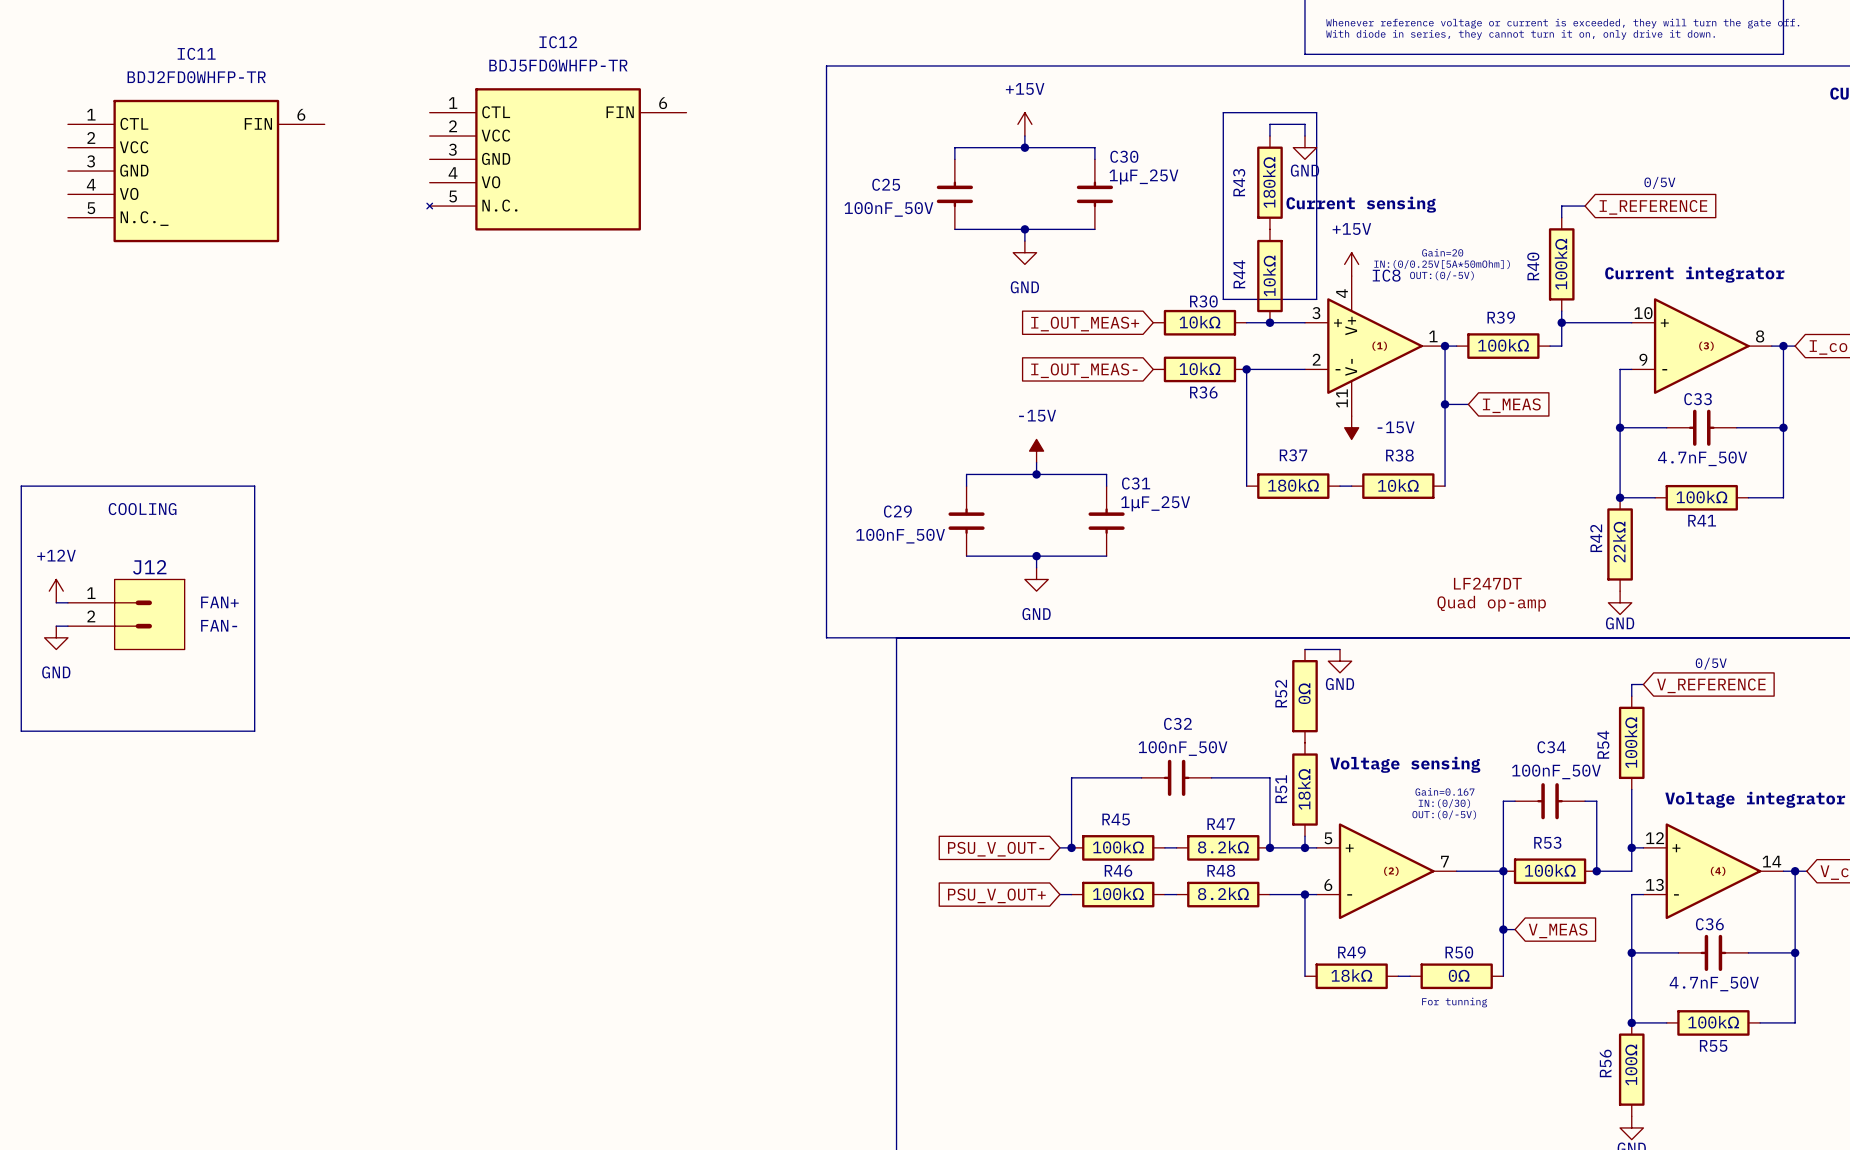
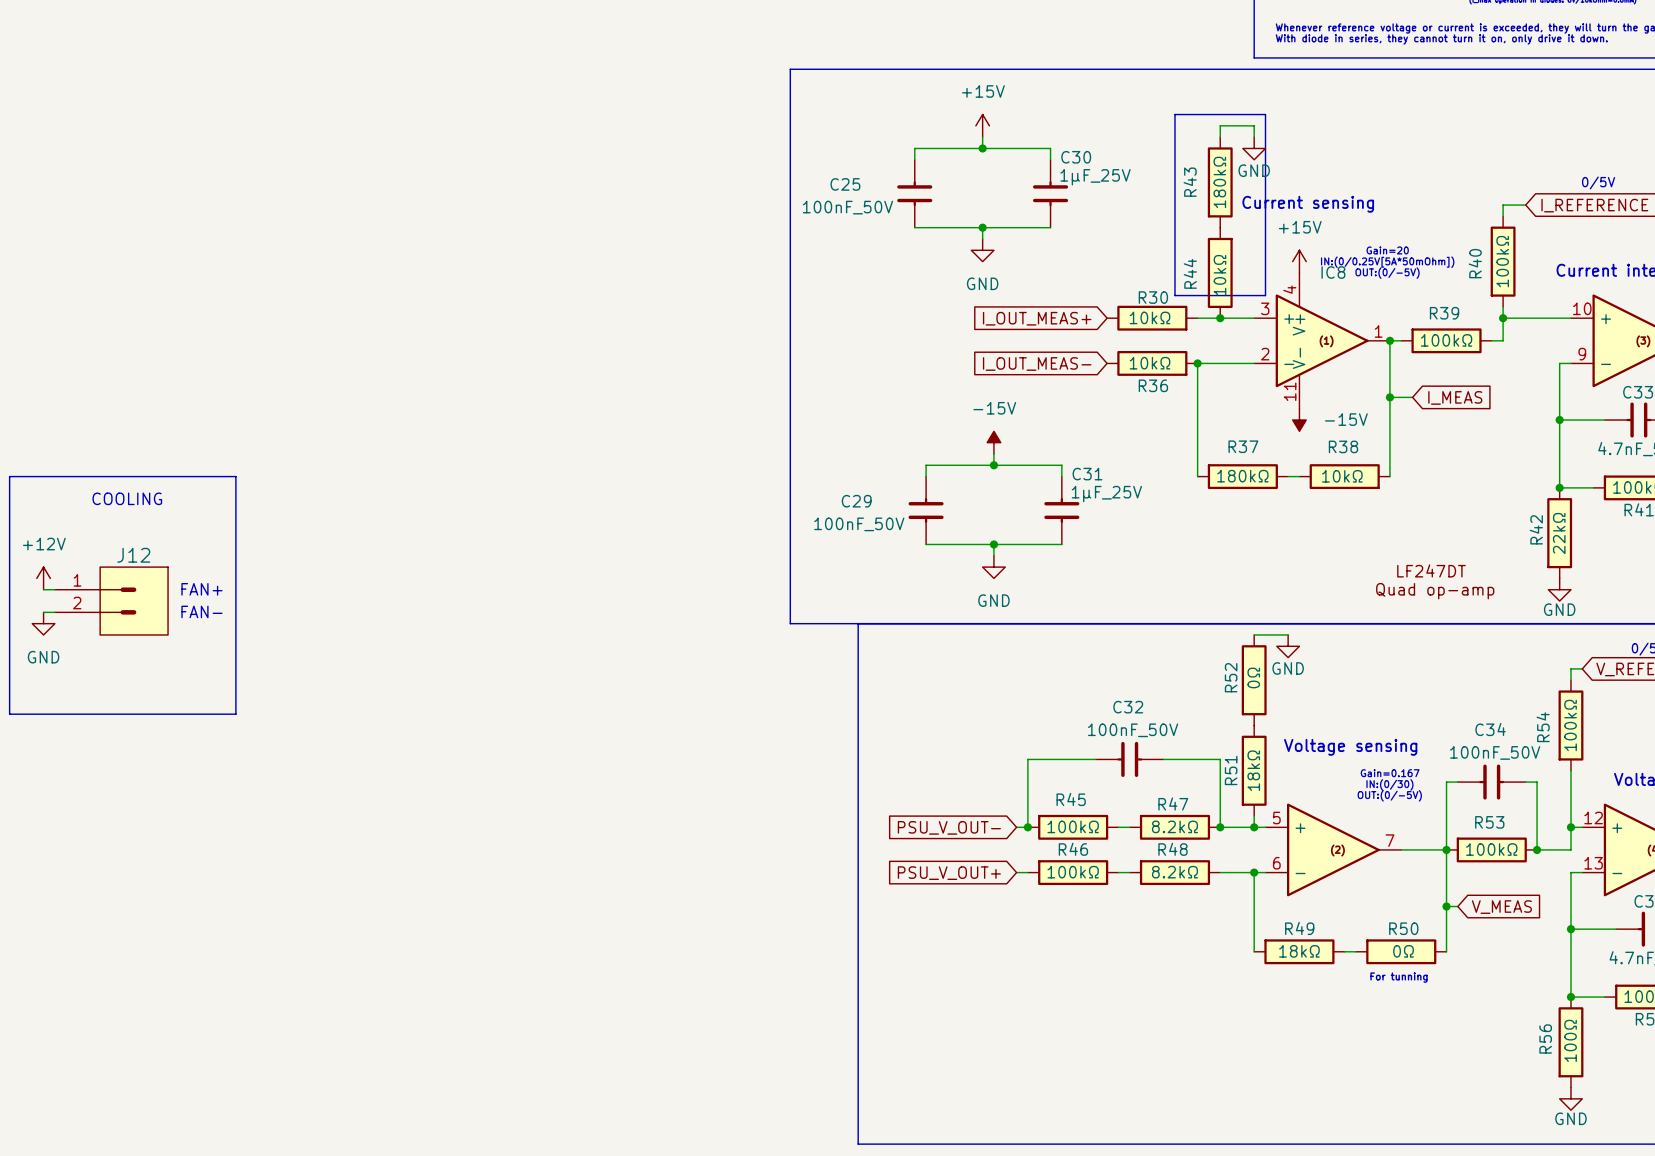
IC12: BDJ5FD0WHFP-TR (556, 159) -> none
IC11: BDJ2FD0WHFP-TR (196, 171) -> none

